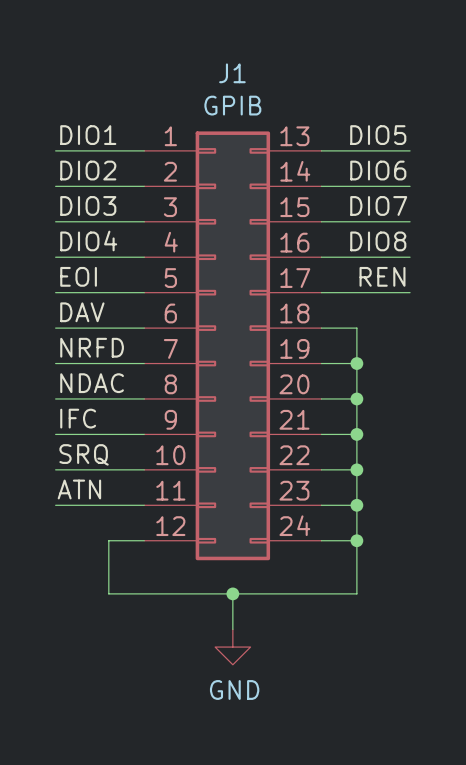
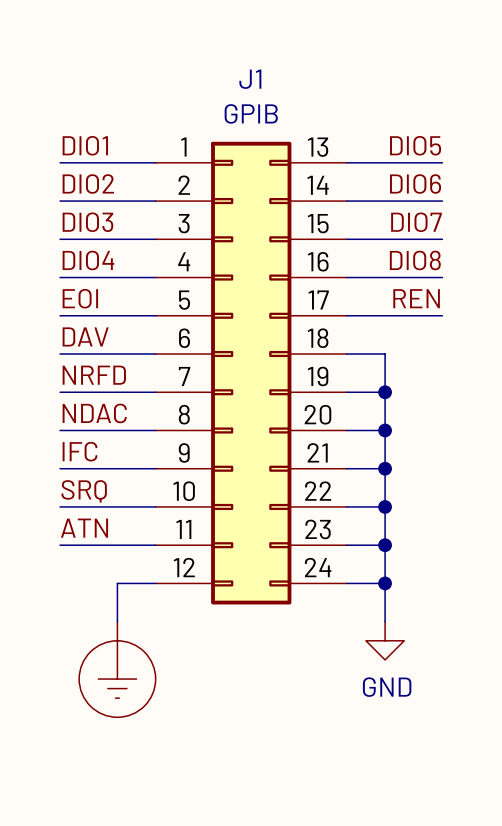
wire: (108, 576) (108, 593) (356, 593) (356, 576) -> none
wire: (232, 593) (232, 629) -> none
junction: (232, 593) -> none
power symbol: none -> (117, 669)
power symbol position: GND (232, 647) -> GND (385, 640)

